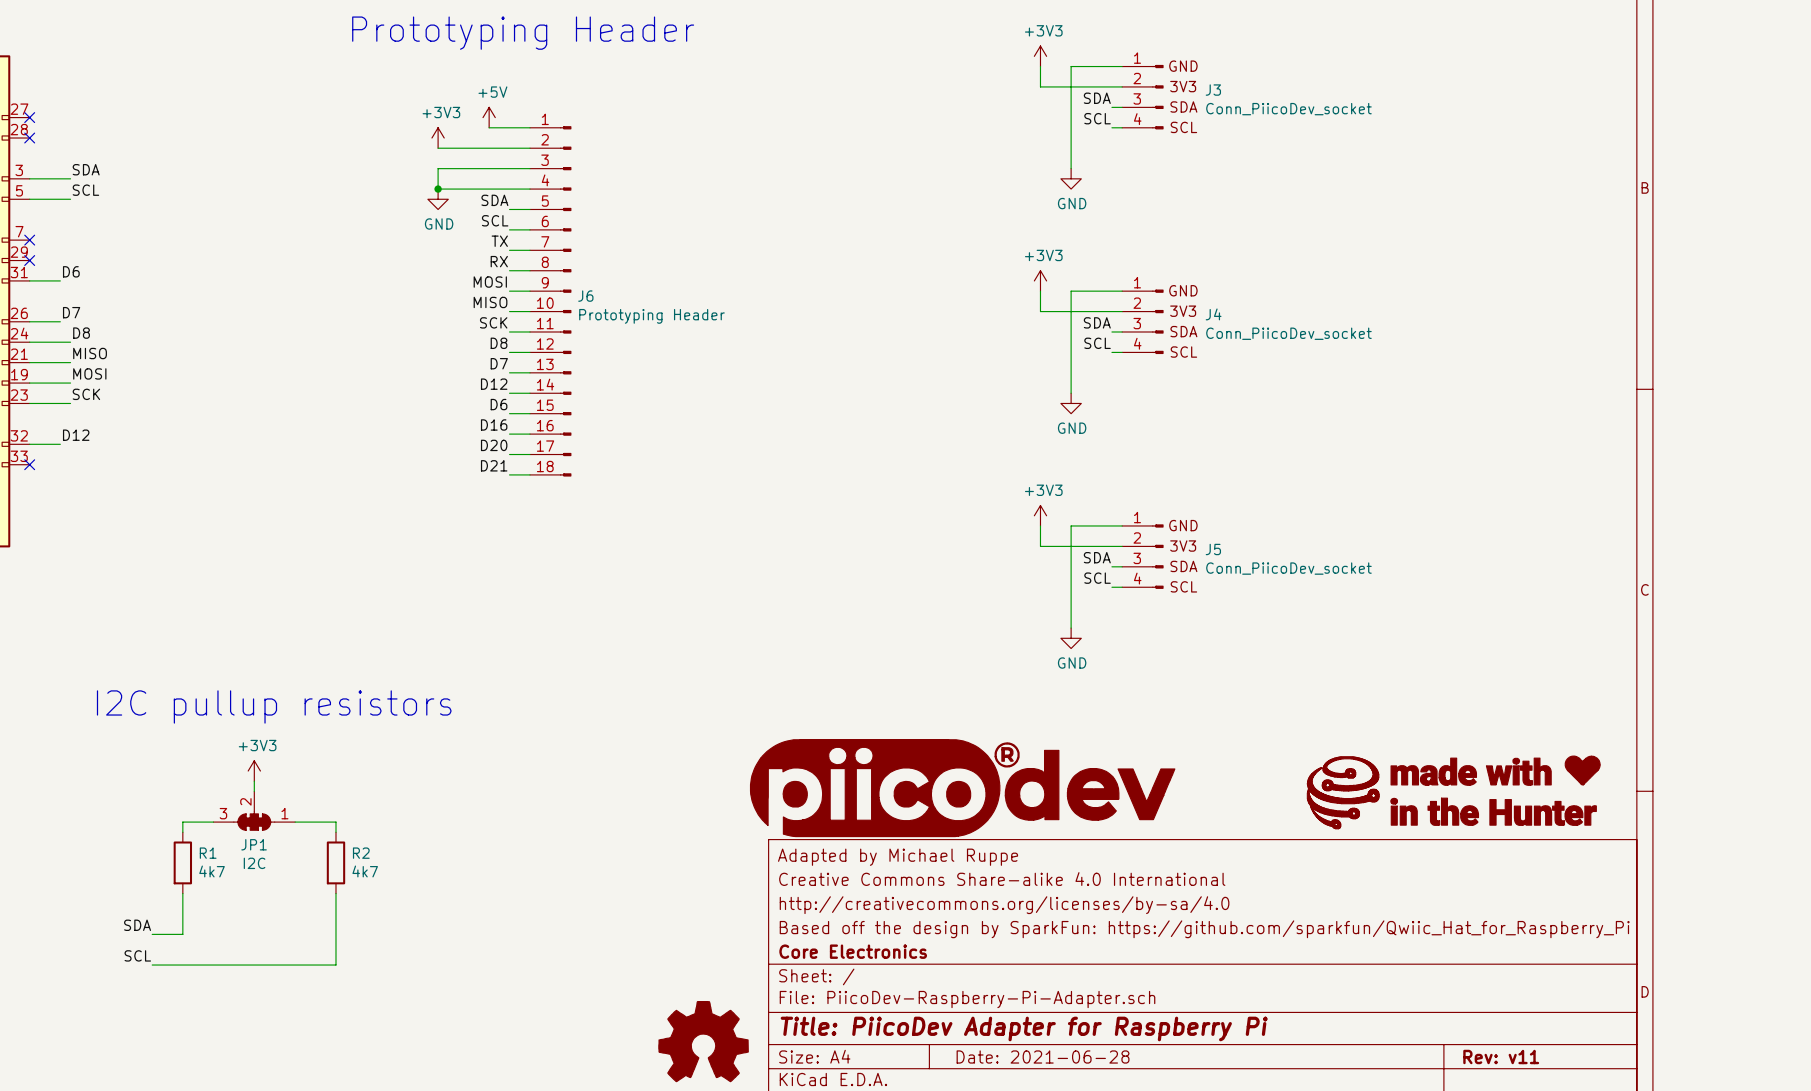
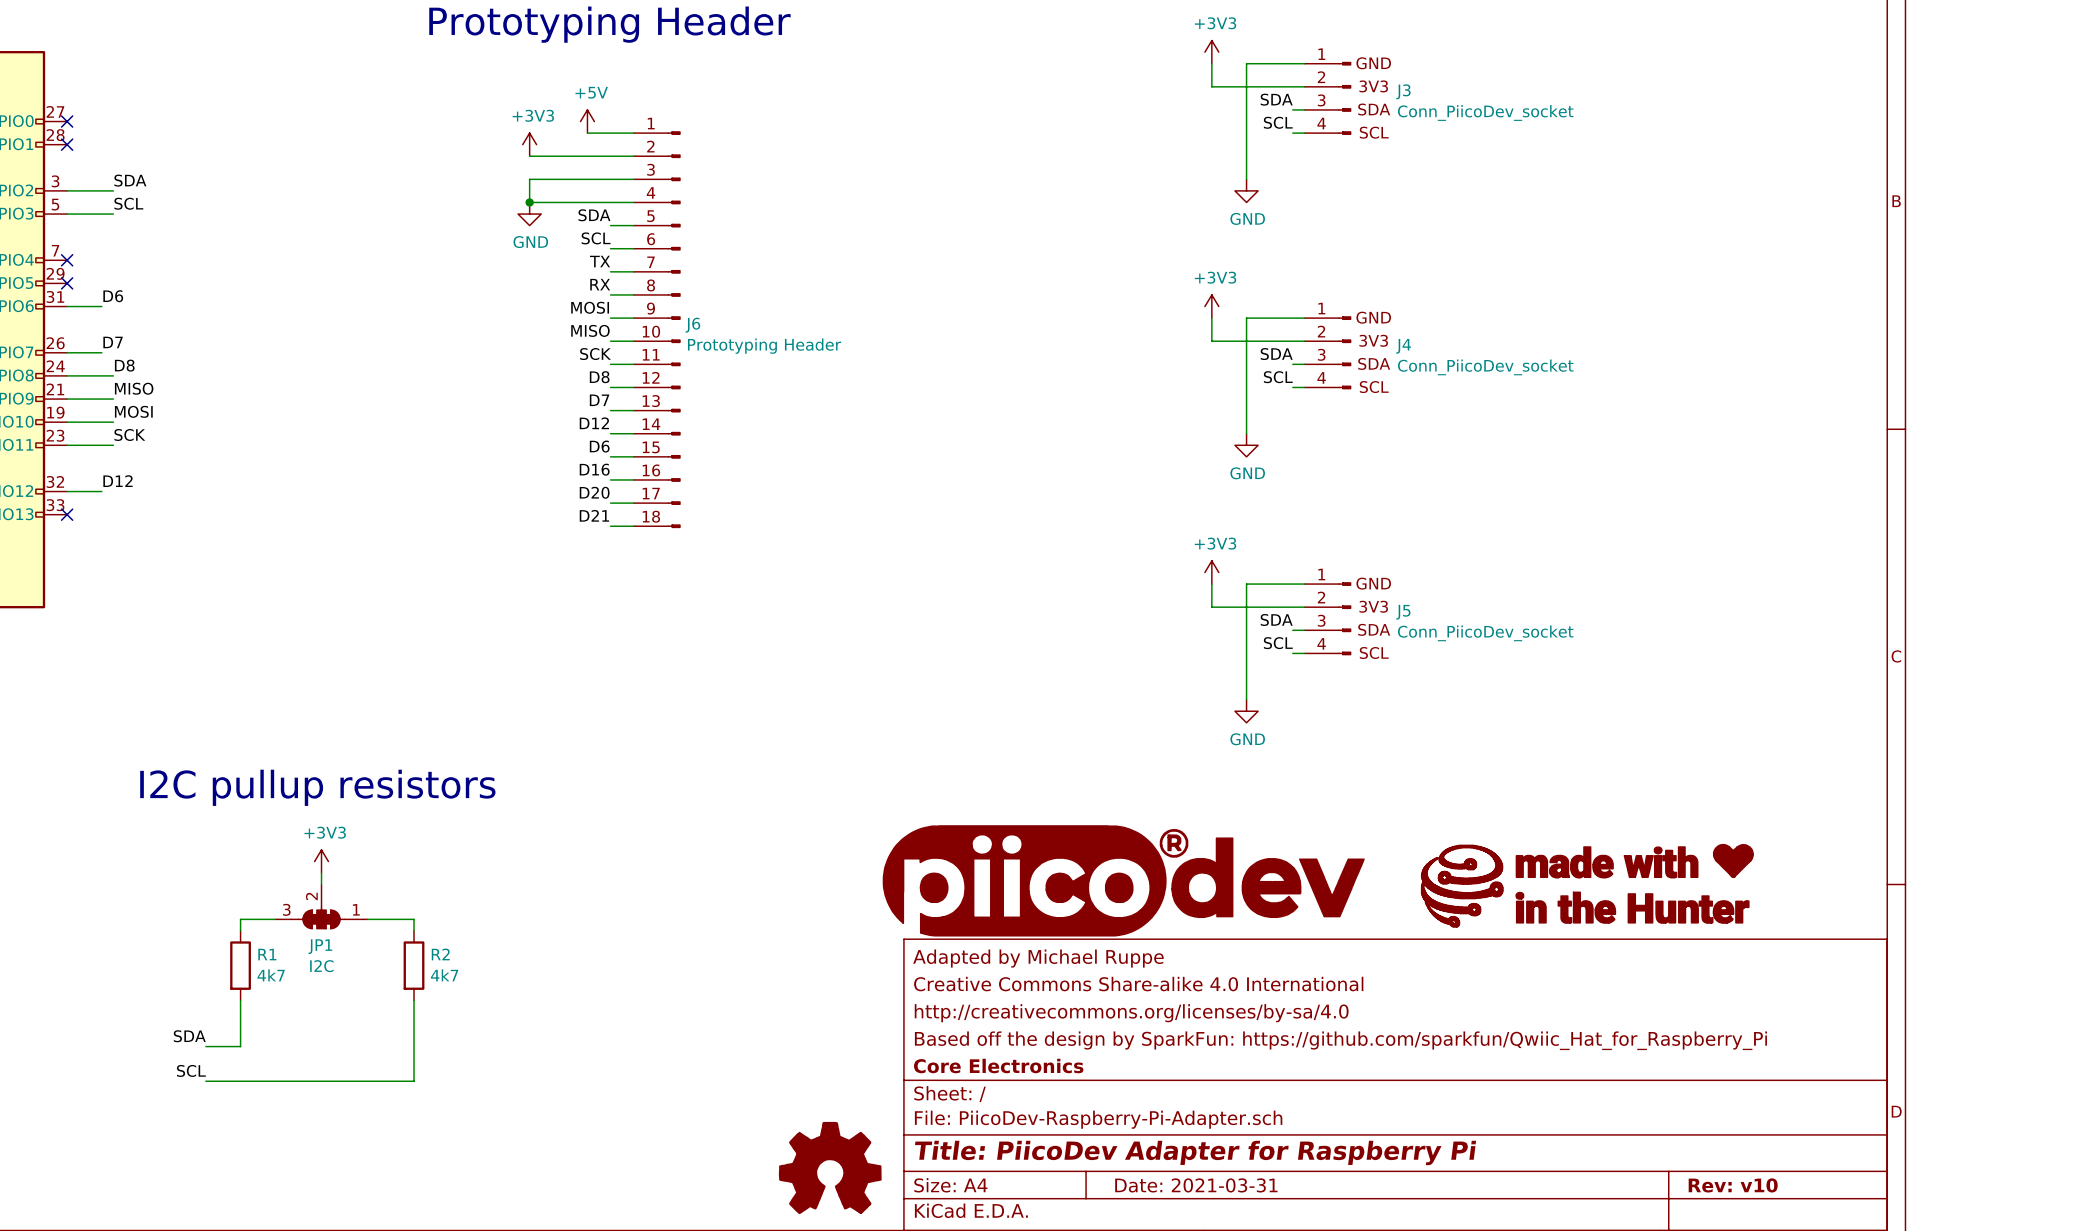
part position: (1453, 792) -> (1587, 885)
title block: Date: 2021-06-28 (1043, 1056) -> Date: 2021-03-31 (1196, 1185)
title block: Rev: v11 (1501, 1056) -> Rev: v10 (1733, 1185)

